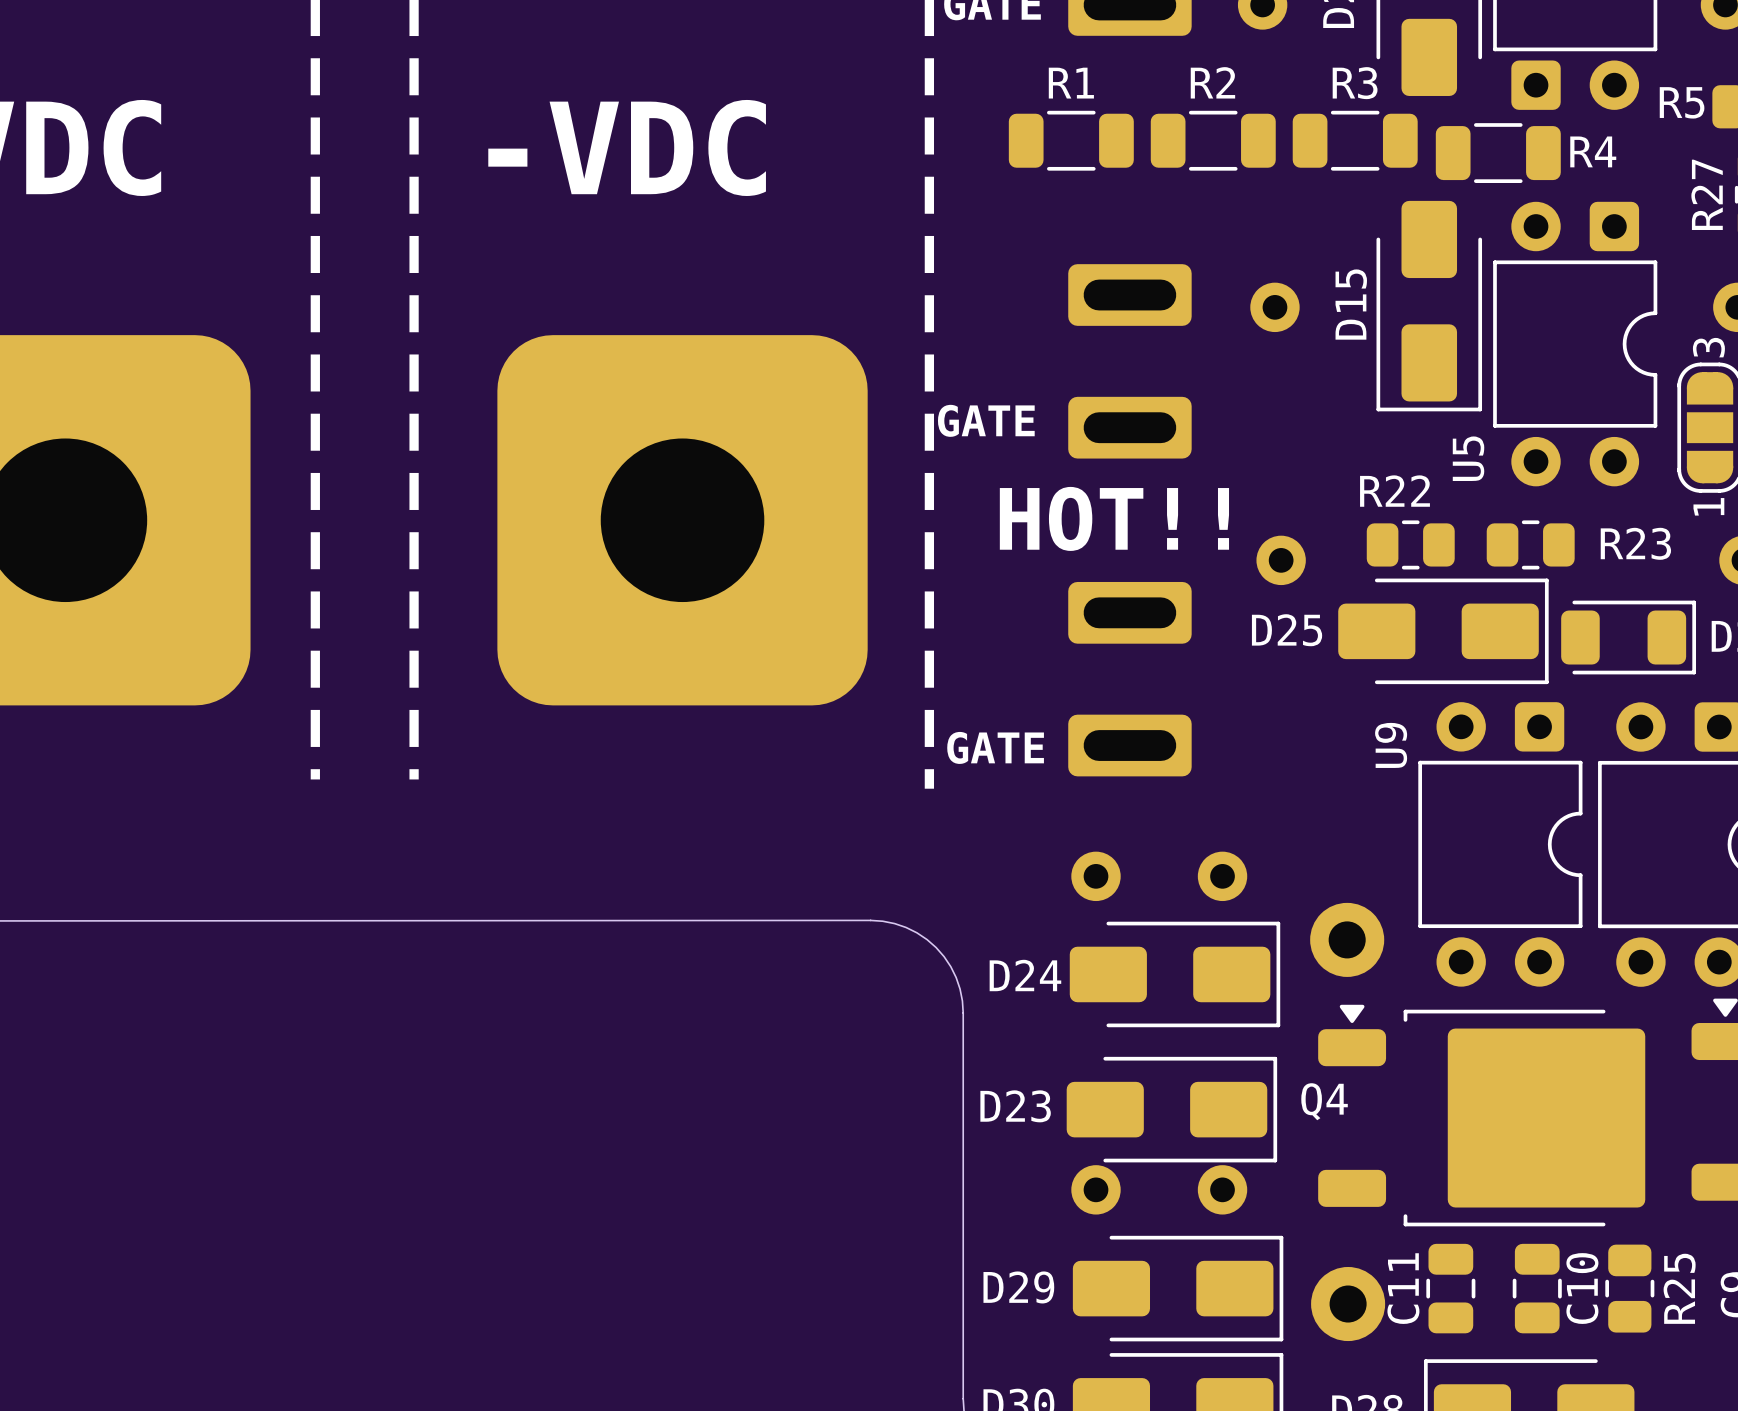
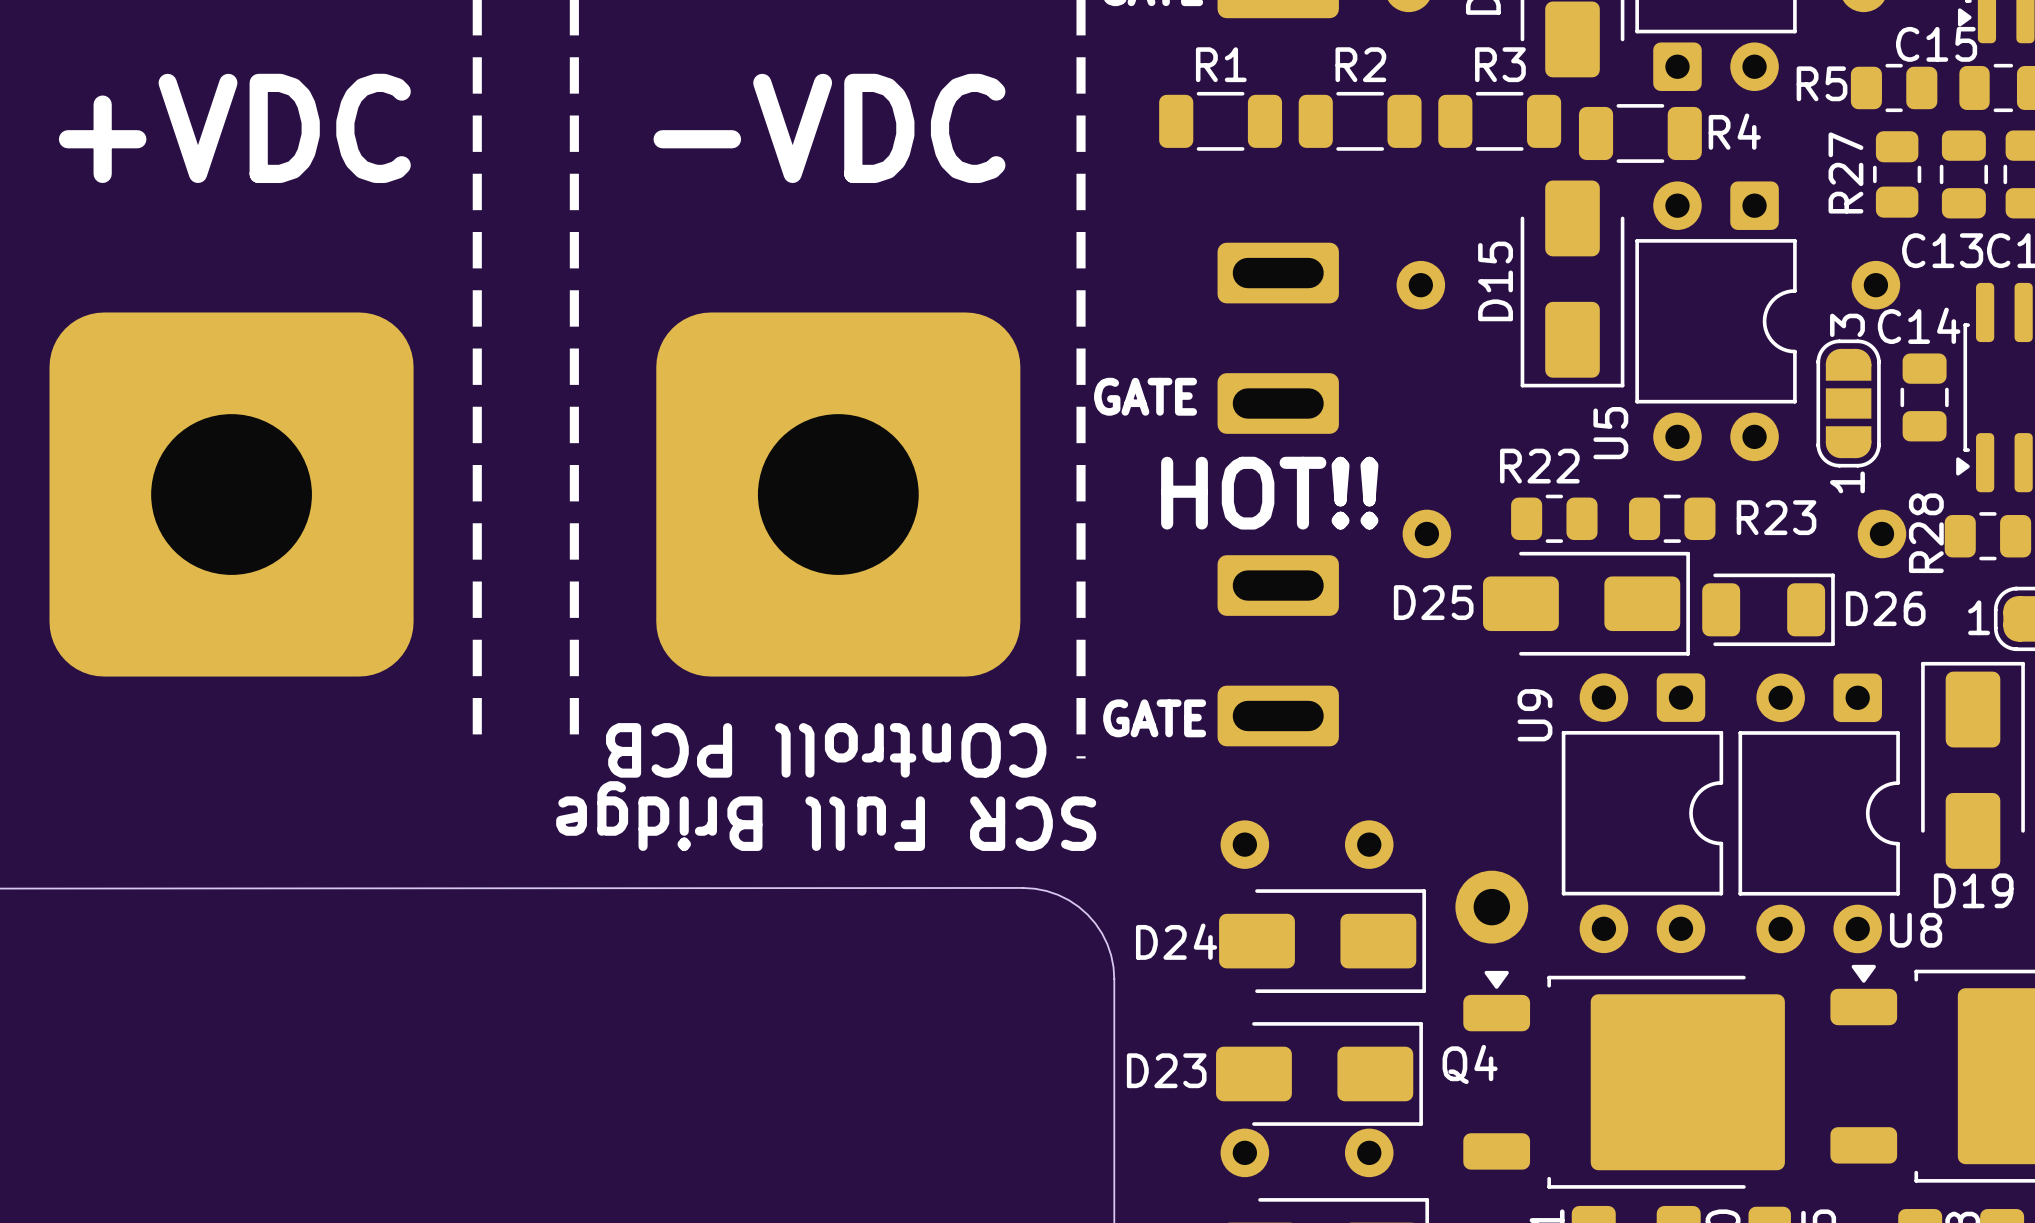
text: none -> COntroll PCB (826, 750)
text: none -> SCR Full Bridge (826, 816)

